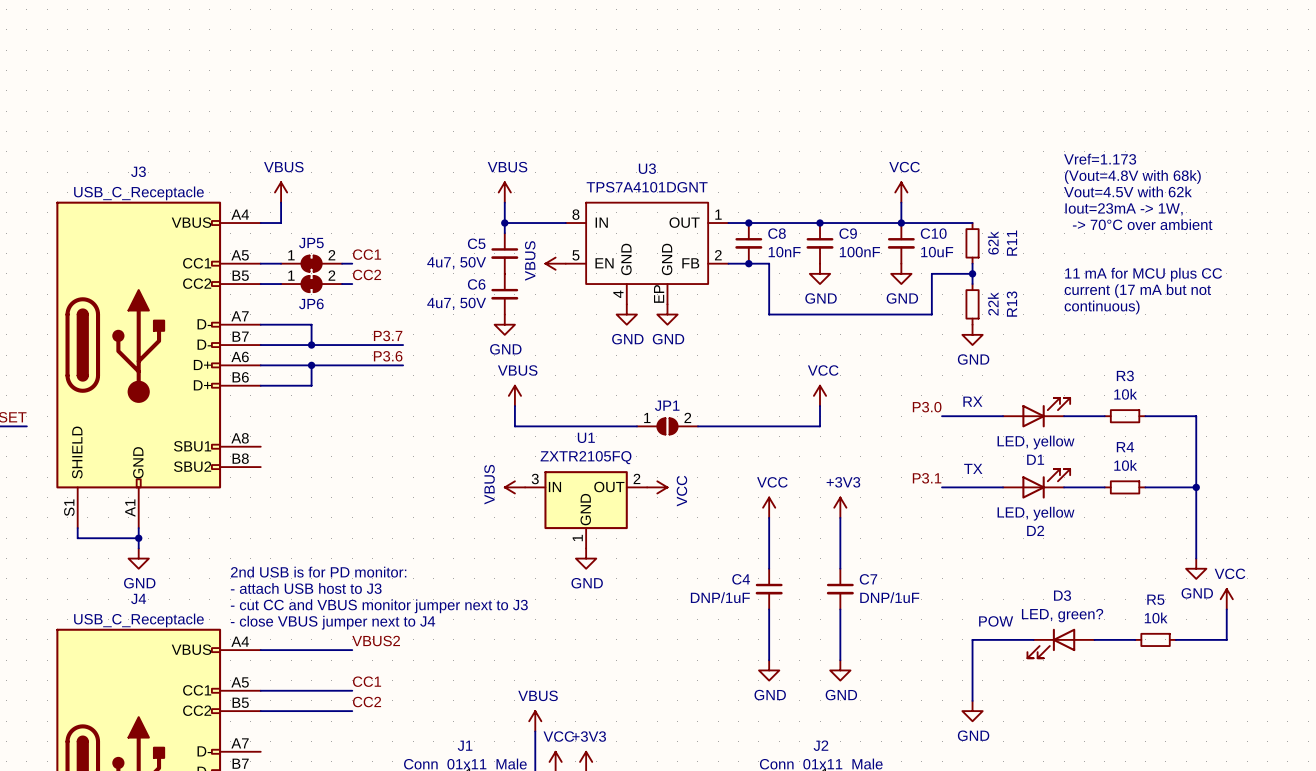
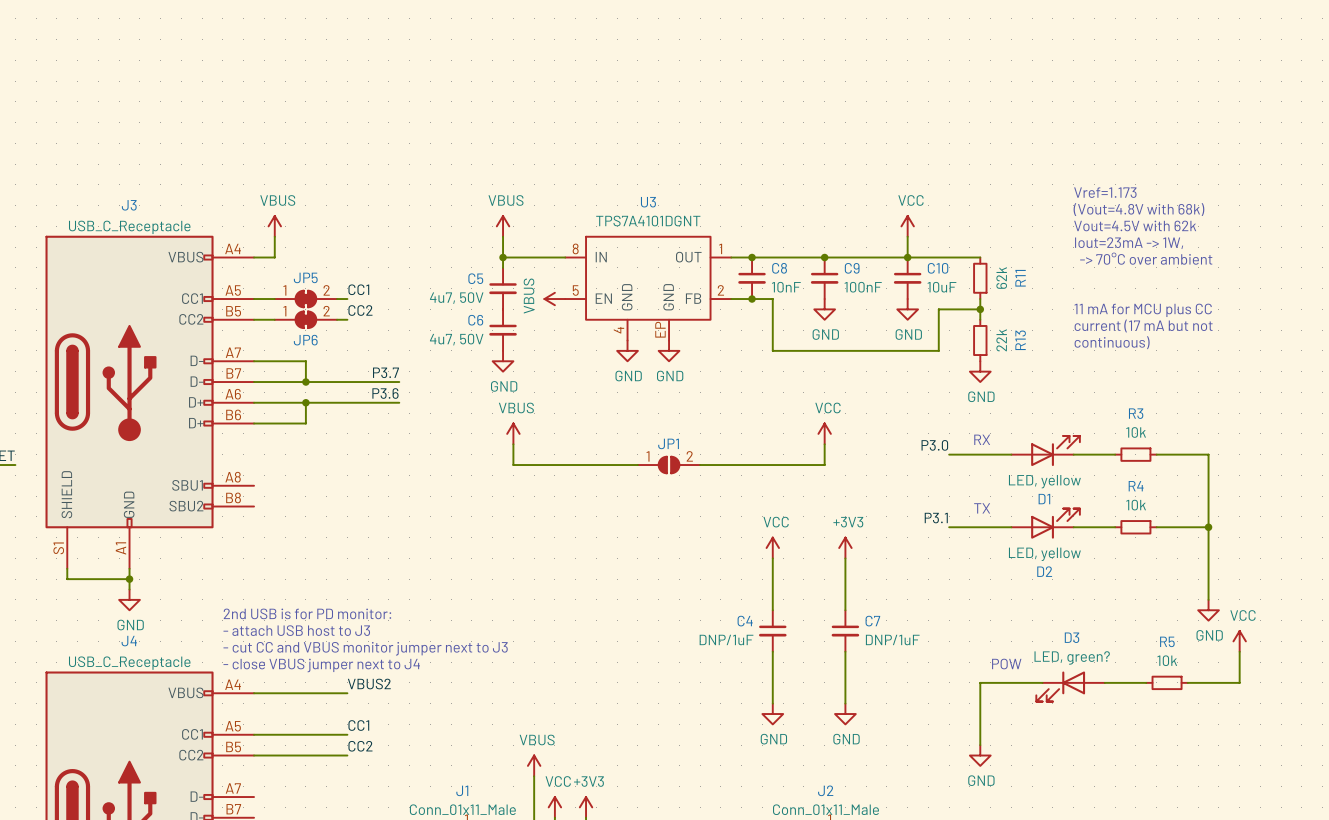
power symbol: VBUS (514, 487) -> none
power symbol: VCC (657, 487) -> none
U1: ZXTR2105FQ (586, 509) -> none
power symbol: GND (586, 558) -> none

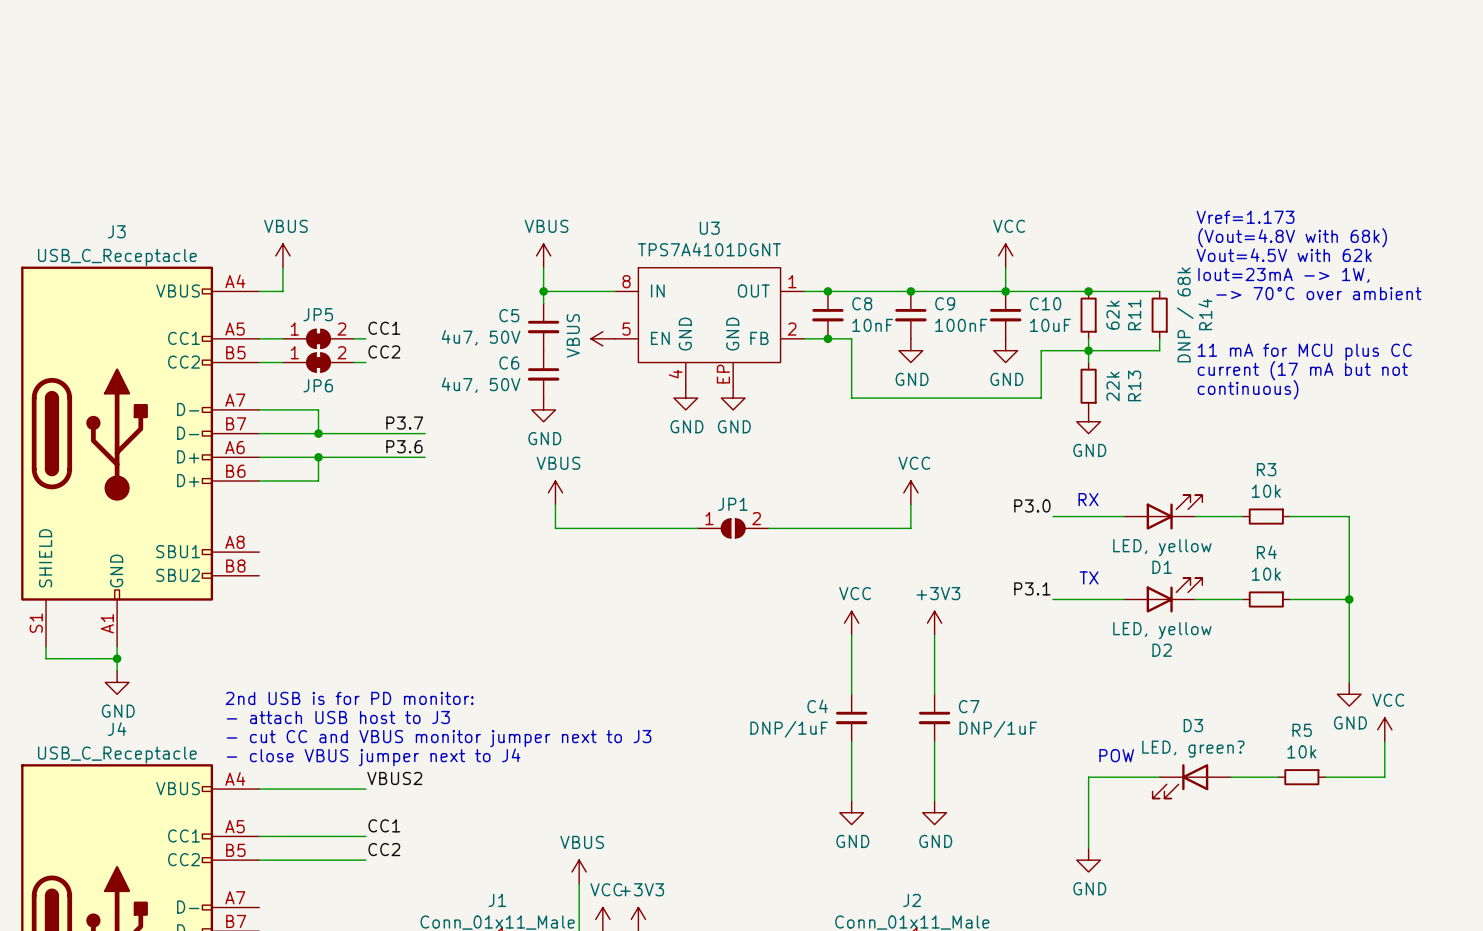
wire: none -> (1088, 291) (1159, 291)
junction: none -> (1088, 291)
R14: none -> DNP / 68k (1159, 315)
wire: none -> (1159, 338) (1159, 350) (1088, 350)

